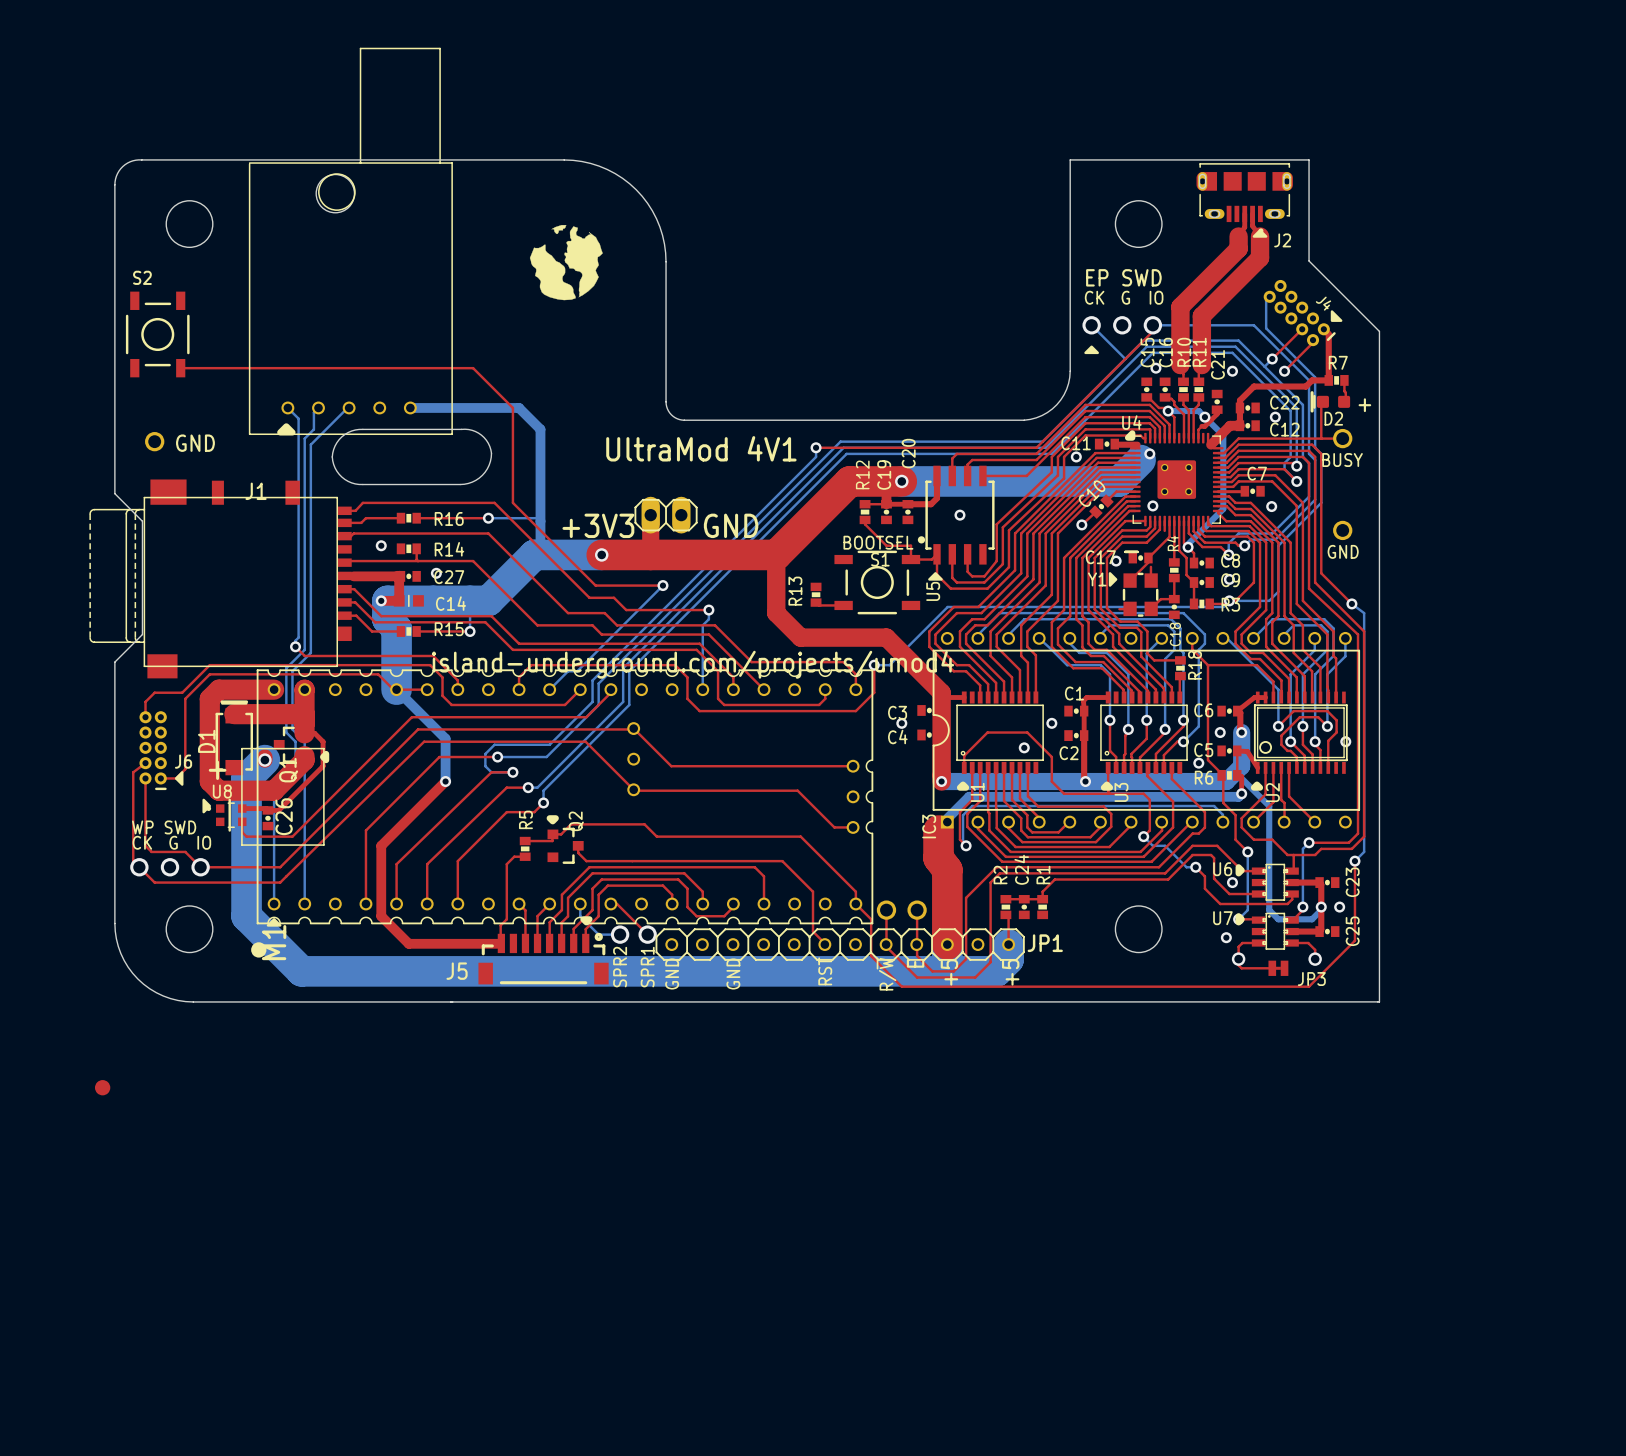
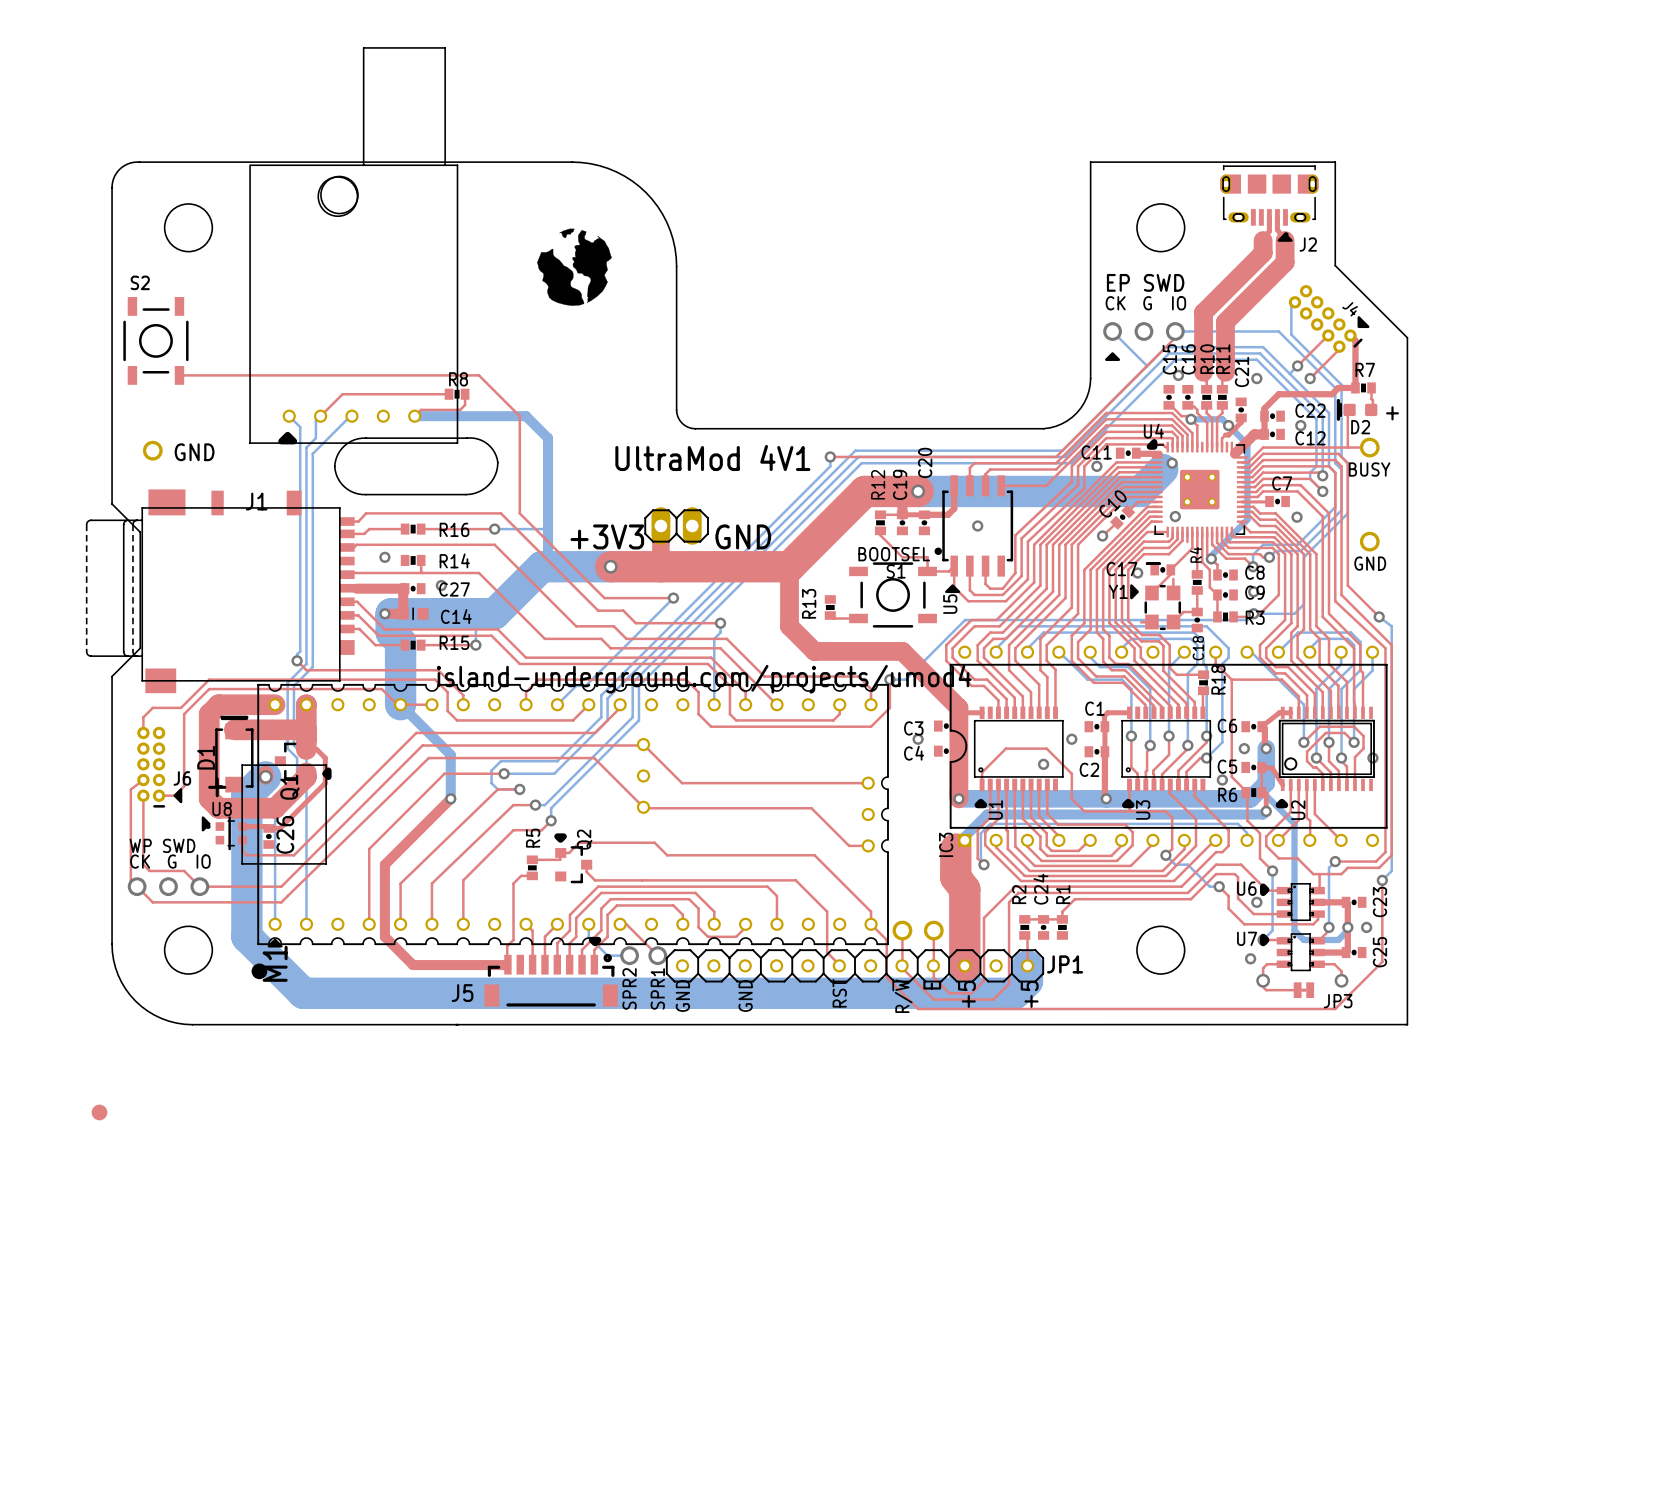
top track: none -> (449, 394) (342, 394) (320, 416)
R8: none -> (457, 394)
top track: none -> (465, 394) (465, 405) (460, 409) (420, 409) (414, 416)

